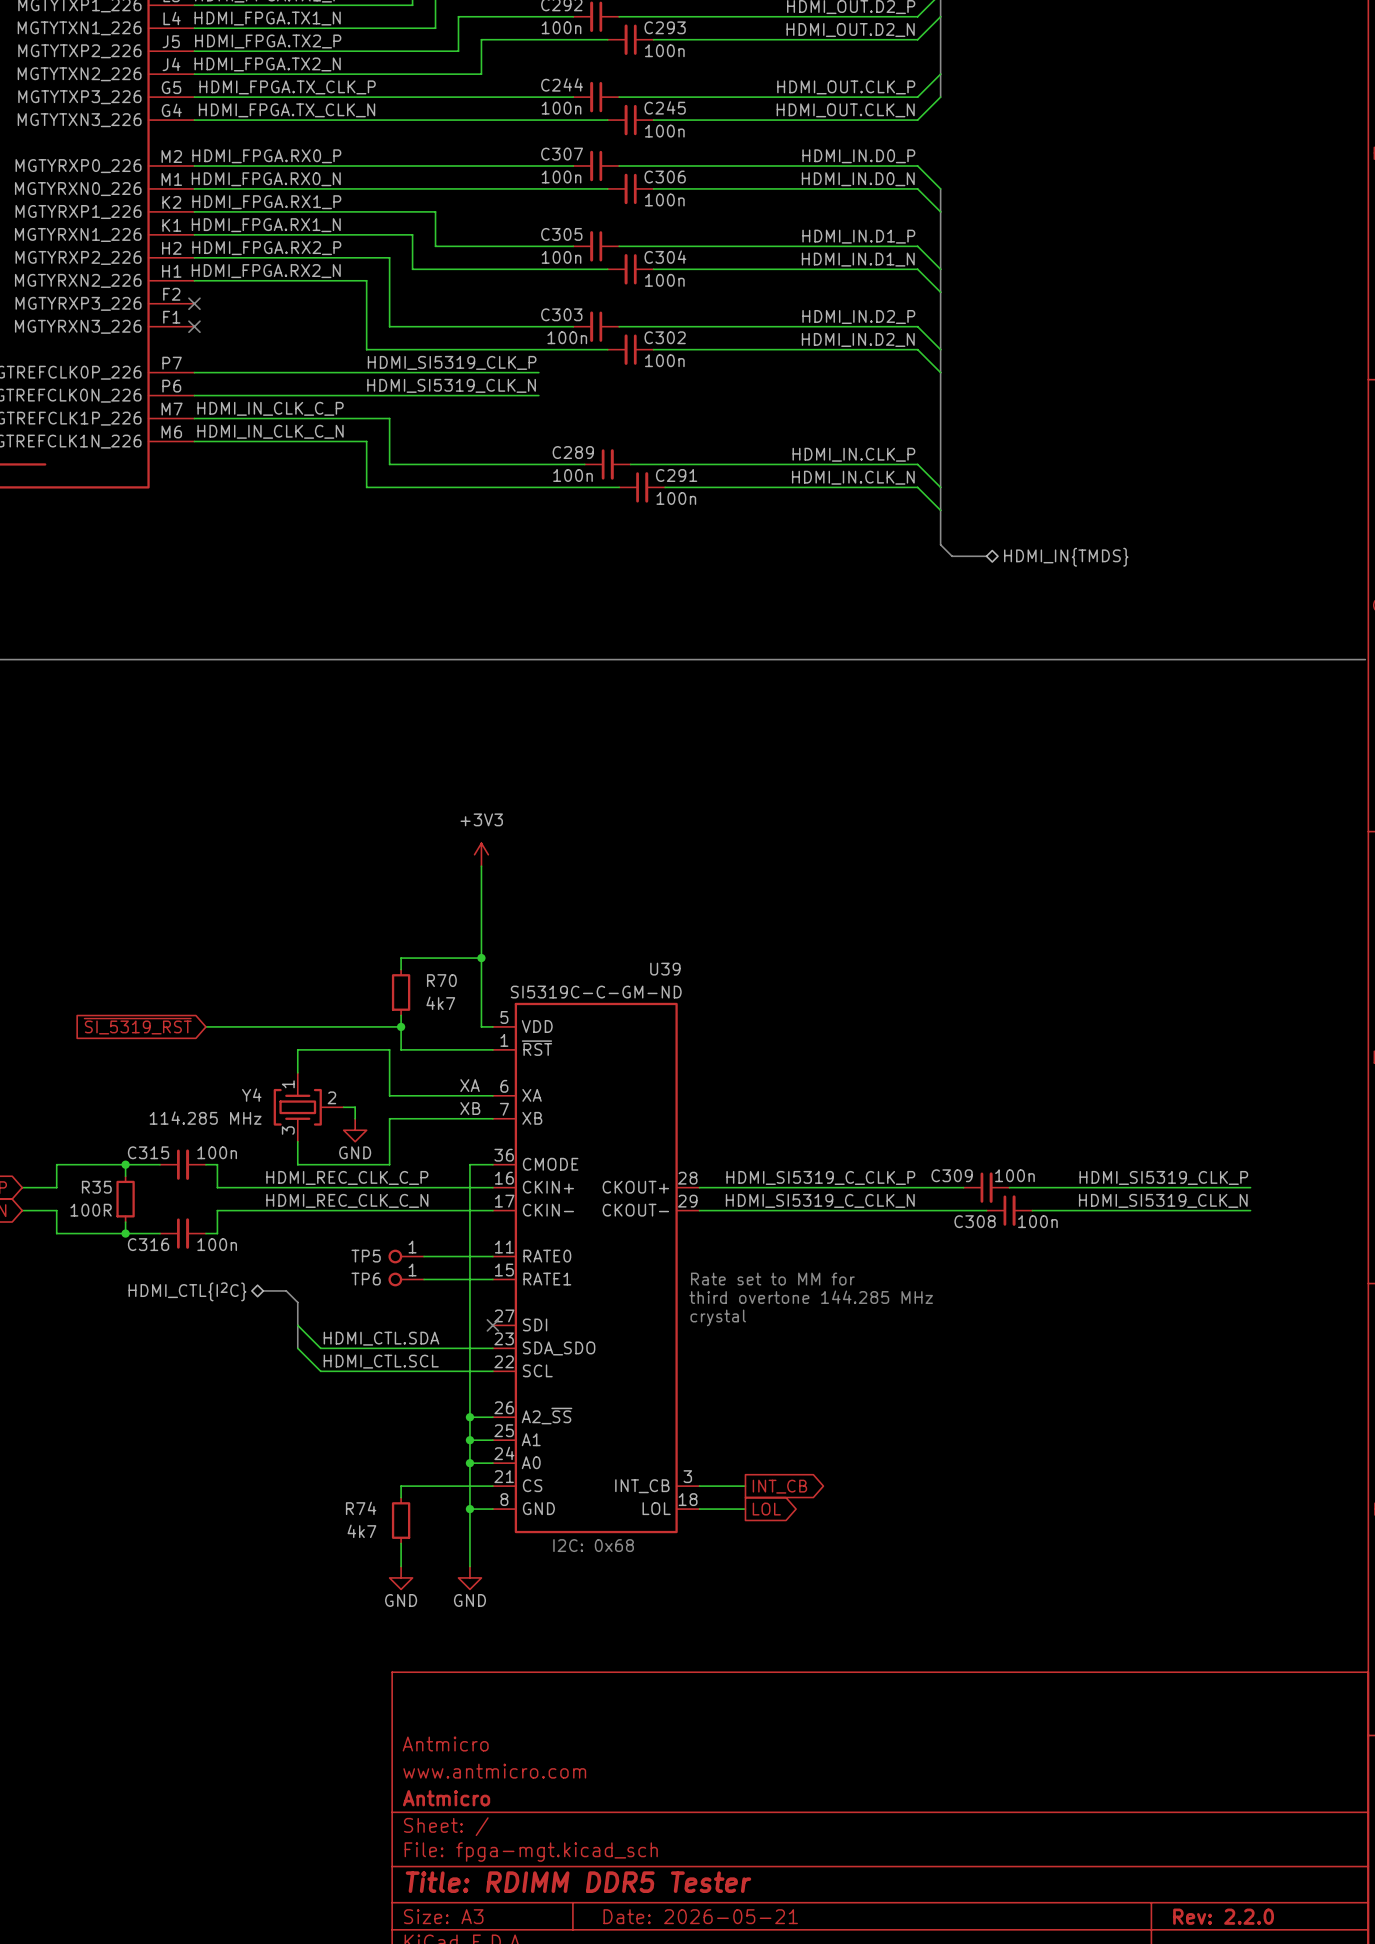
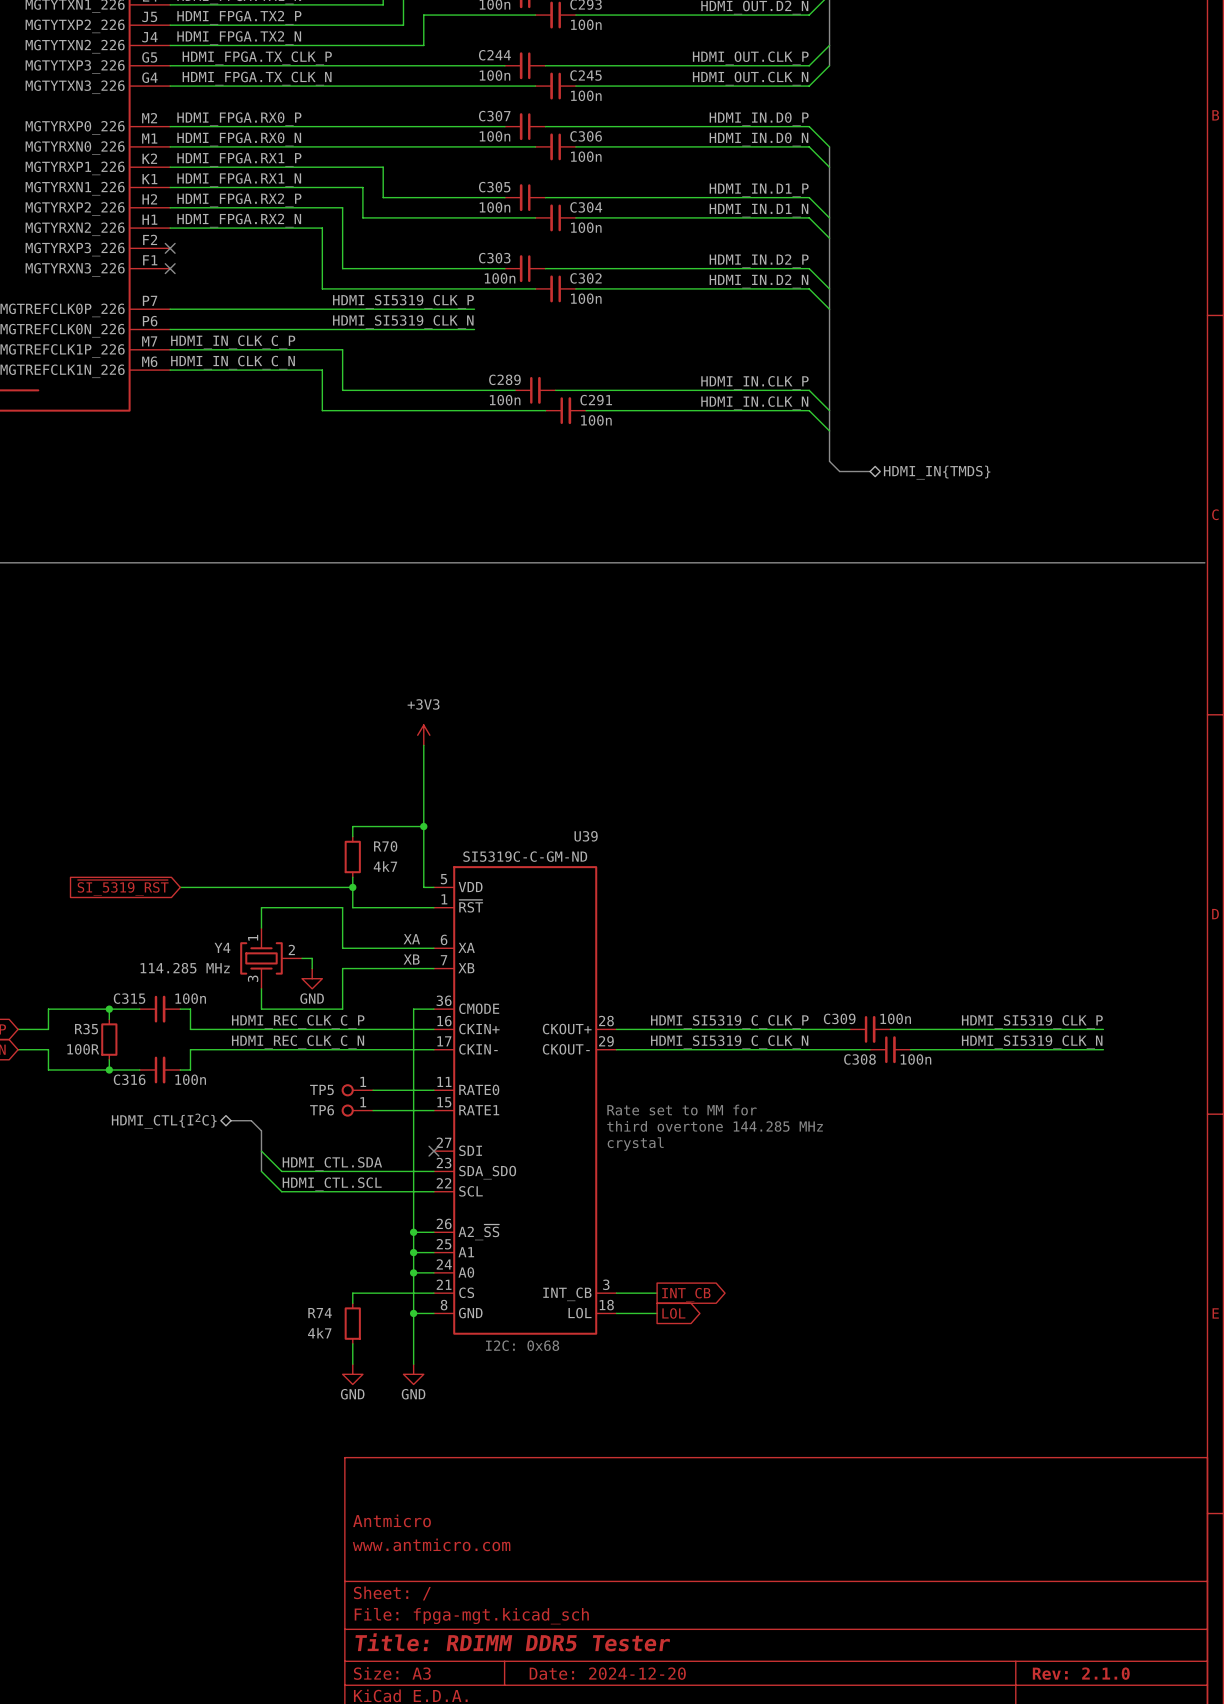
title block: Antmicro (446, 1798) -> none
title block: Date: 2026-05-21 (700, 1916) -> Date: 2024-12-20 (607, 1673)
title block: Rev: 2.2.0 (1223, 1916) -> Rev: 2.1.0 (1081, 1673)

